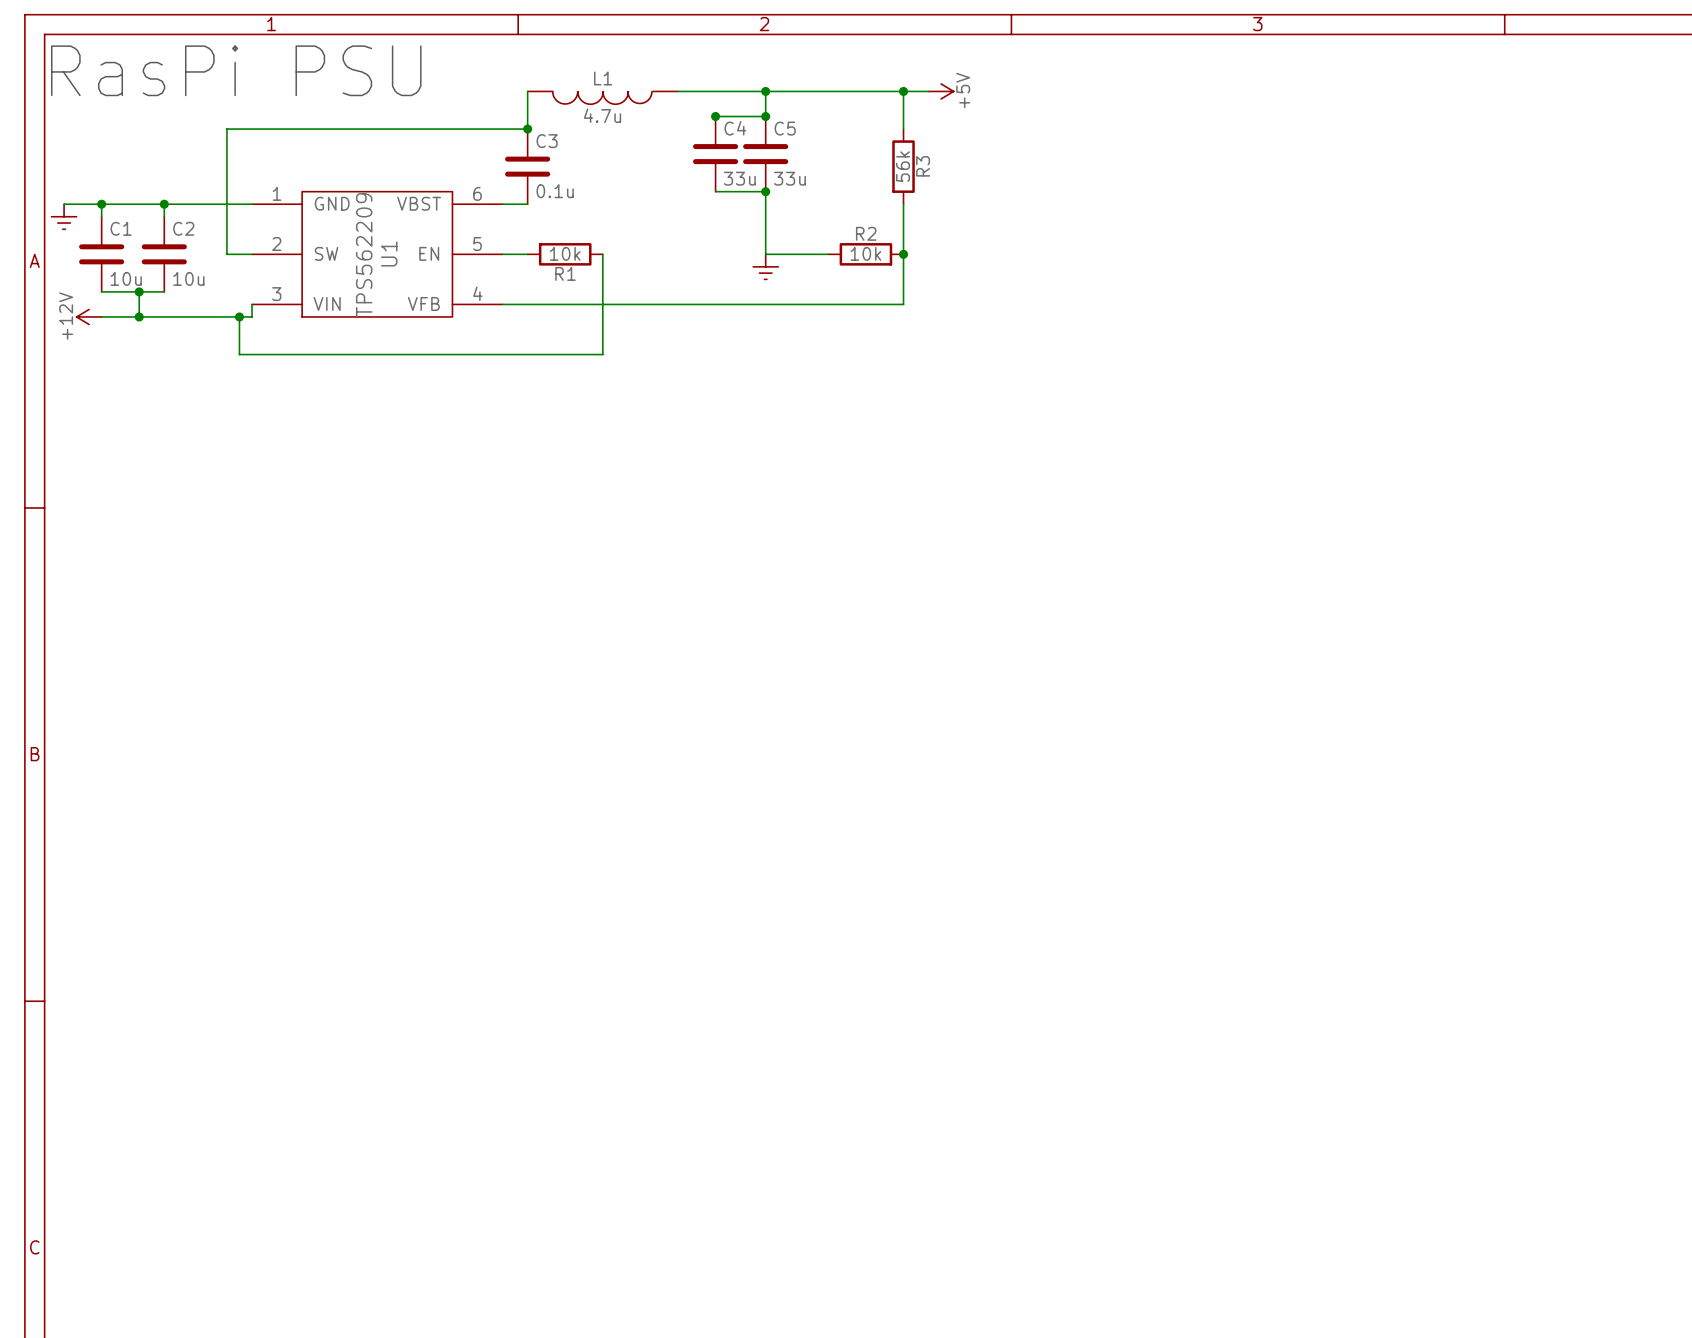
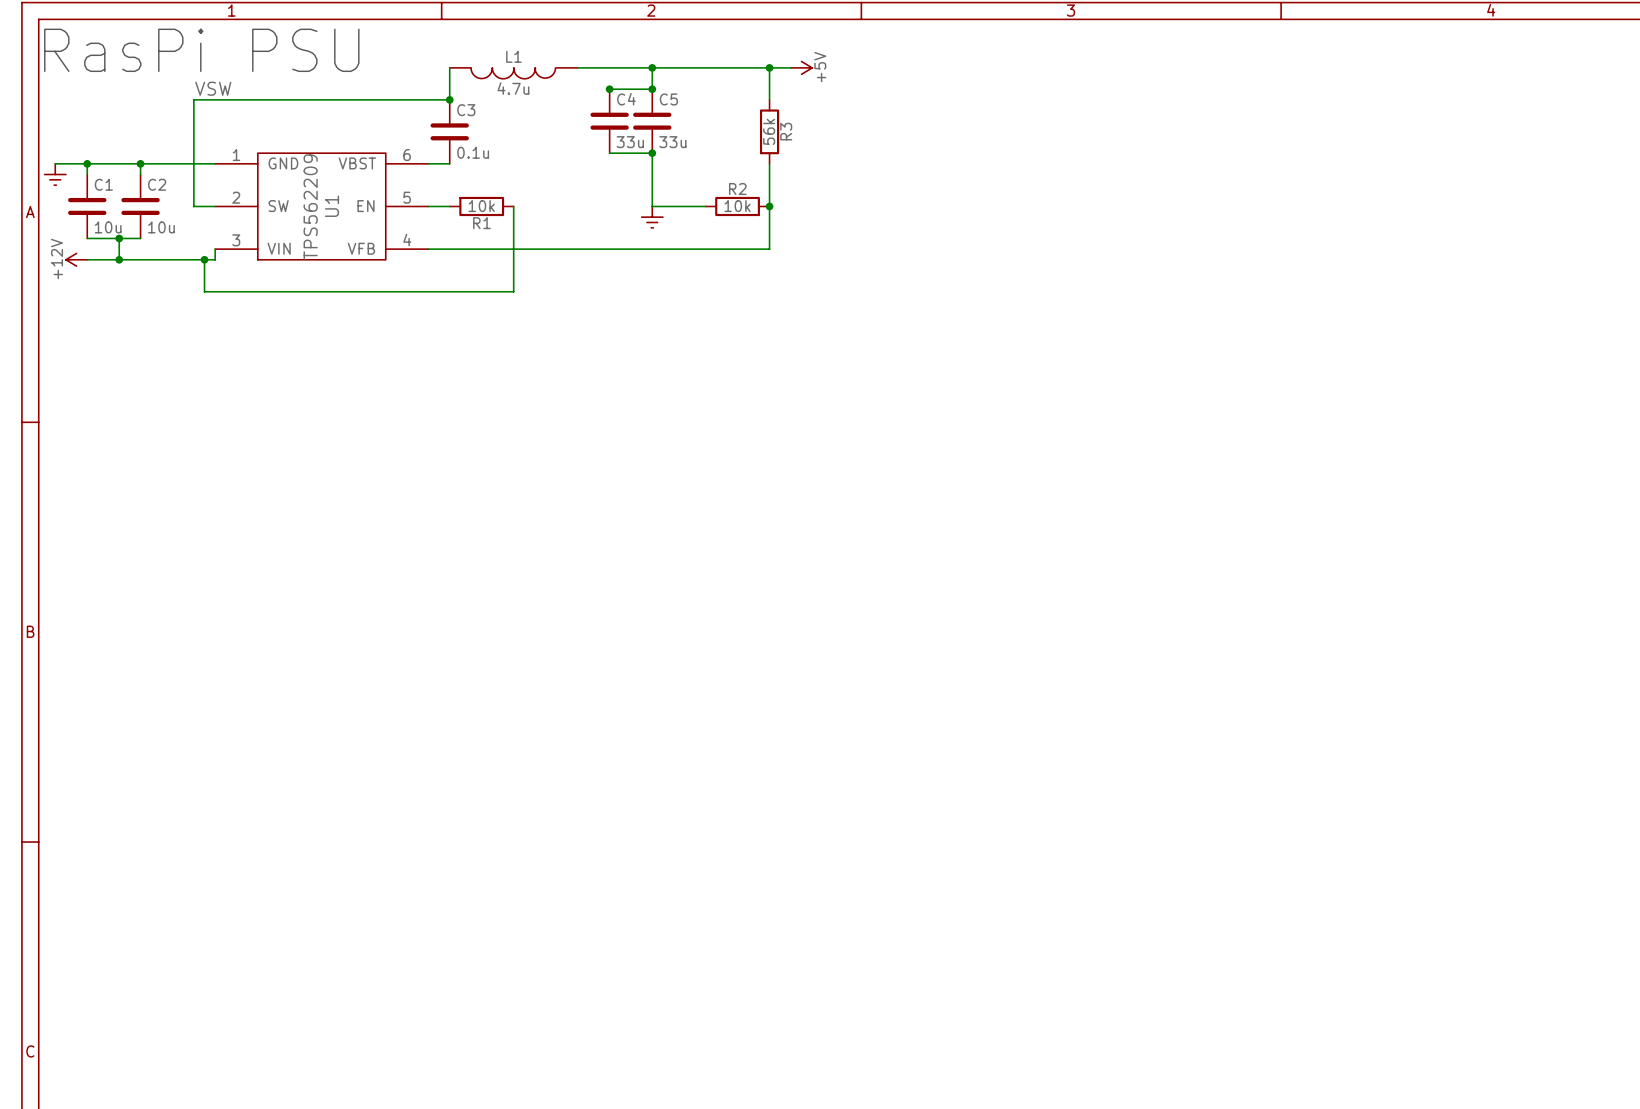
label: none -> VSW (213, 88)

